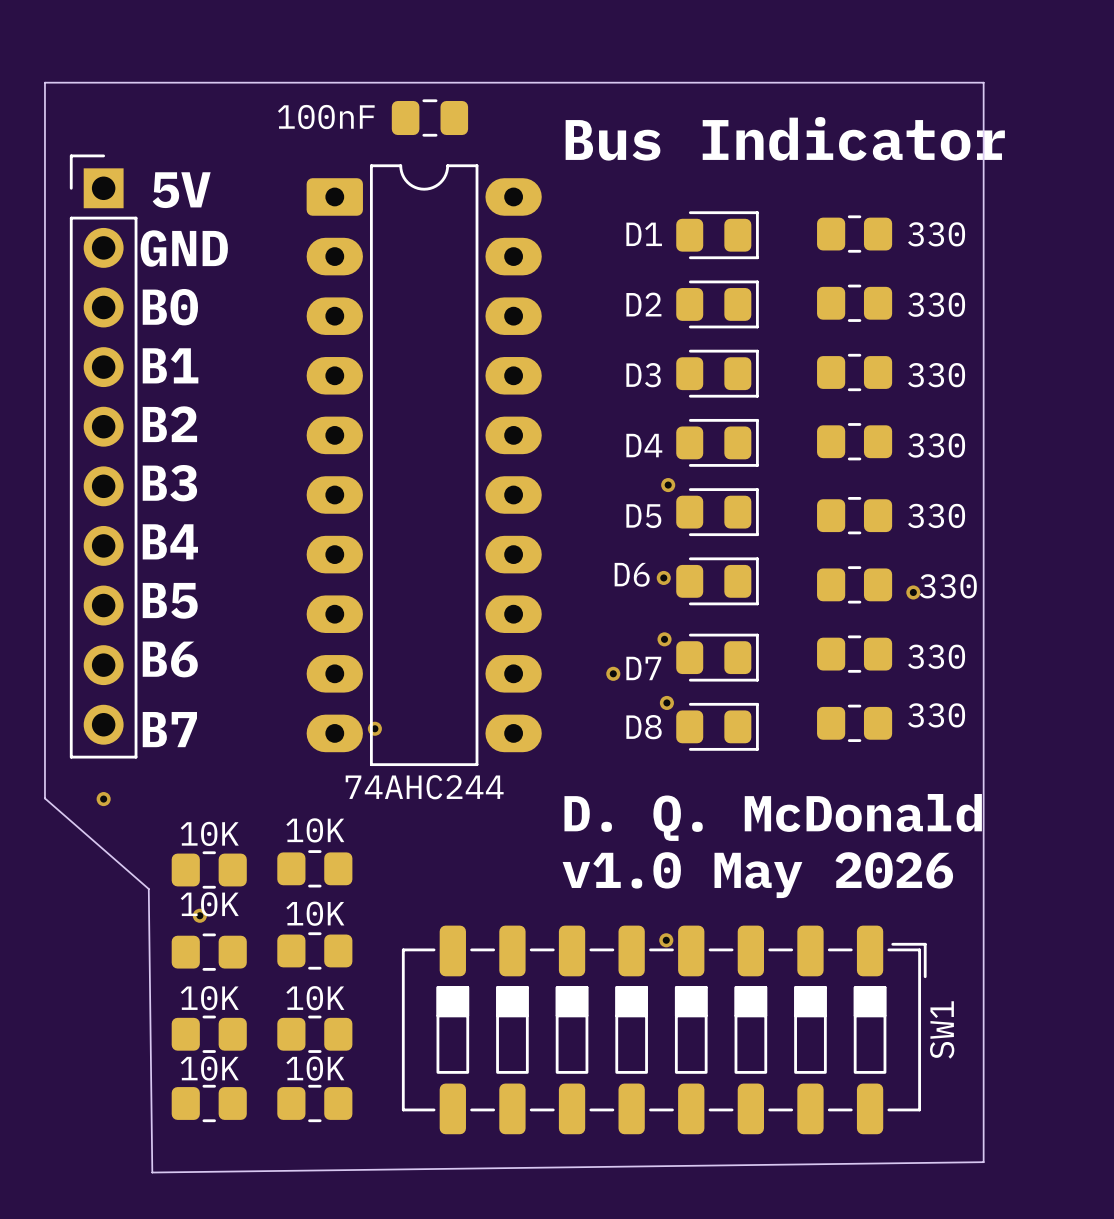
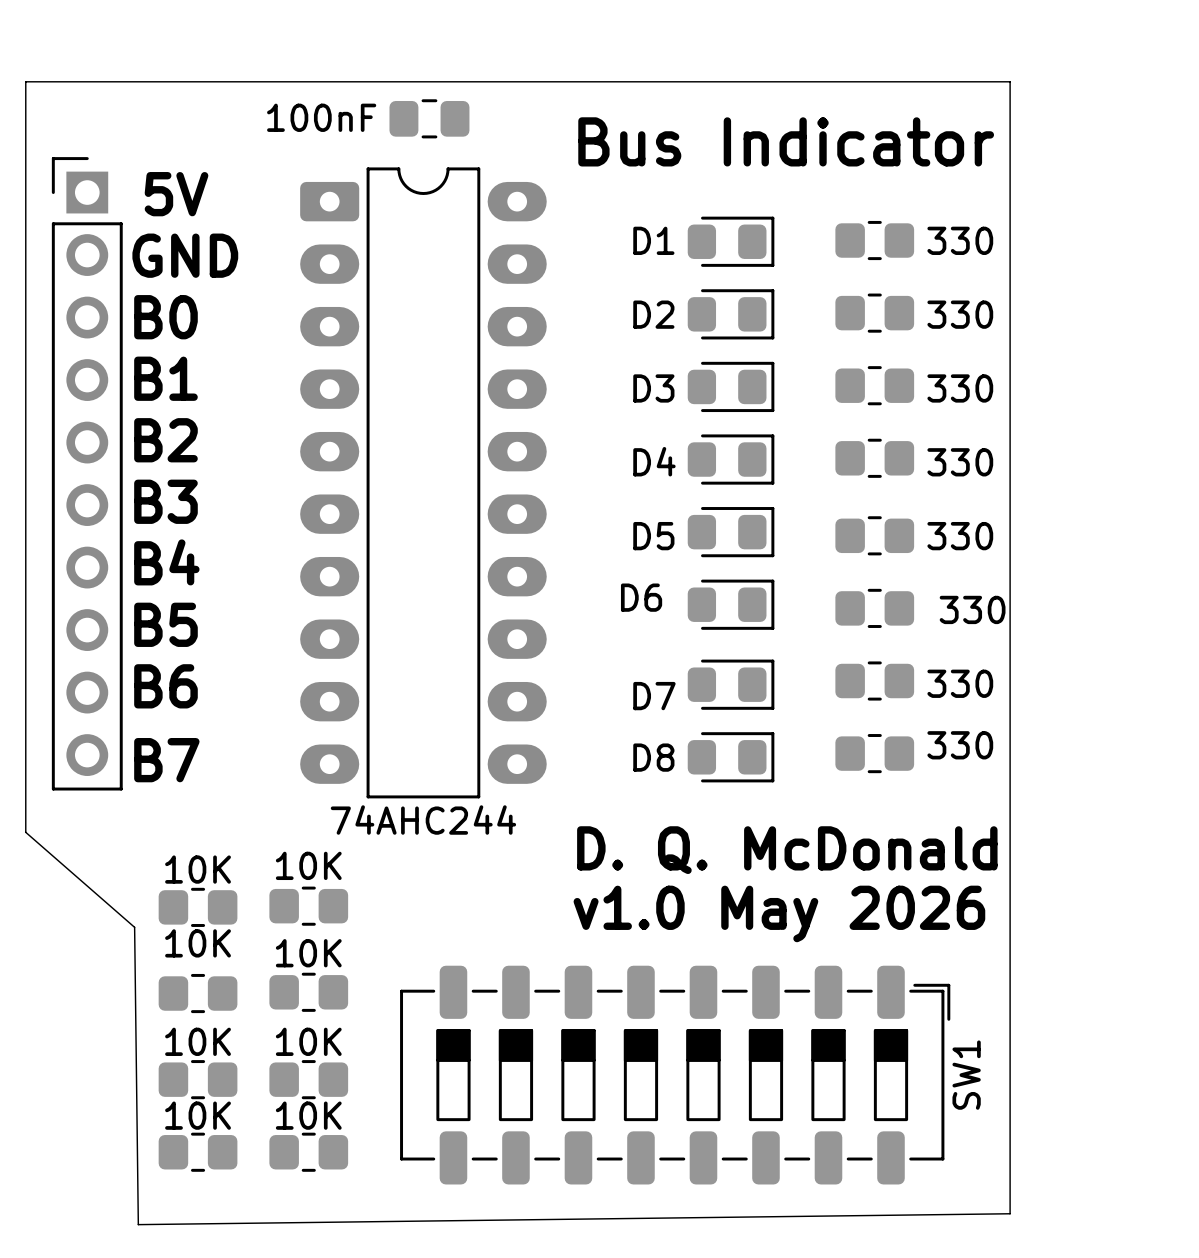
via: (668, 485) -> none
via: (663, 577) -> none
via: (913, 592) -> none
via: (664, 639) -> none
via: (613, 673) -> none
via: (666, 702) -> none
via: (374, 728) -> none
via: (103, 799) -> none
via: (199, 915) -> none
via: (666, 940) -> none

